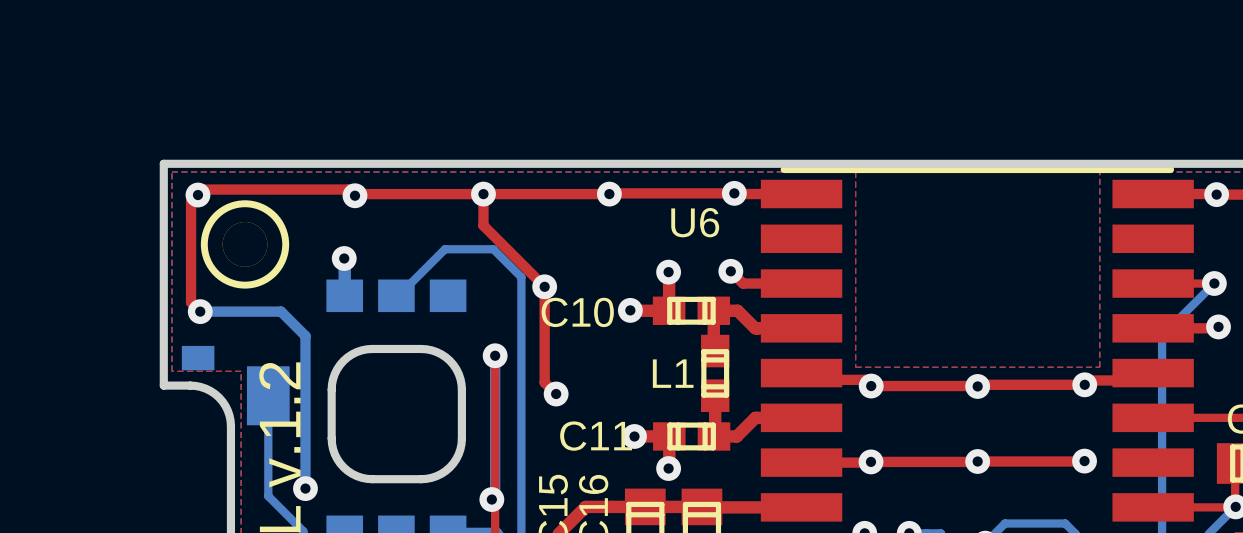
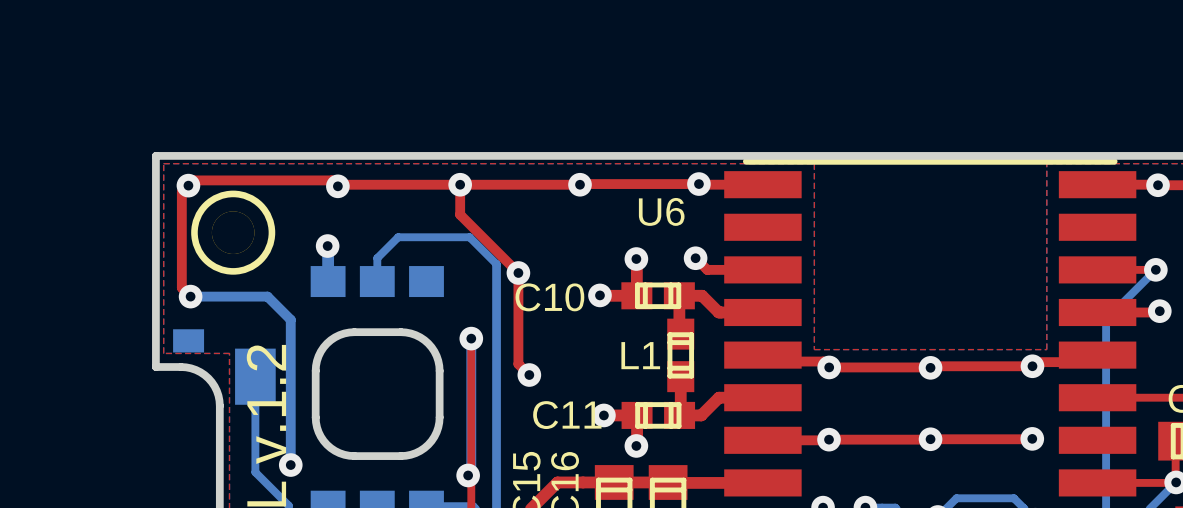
bottom track: (444, 249) (396, 295) -> (423, 237) (398, 237) (377, 258) (377, 281)

